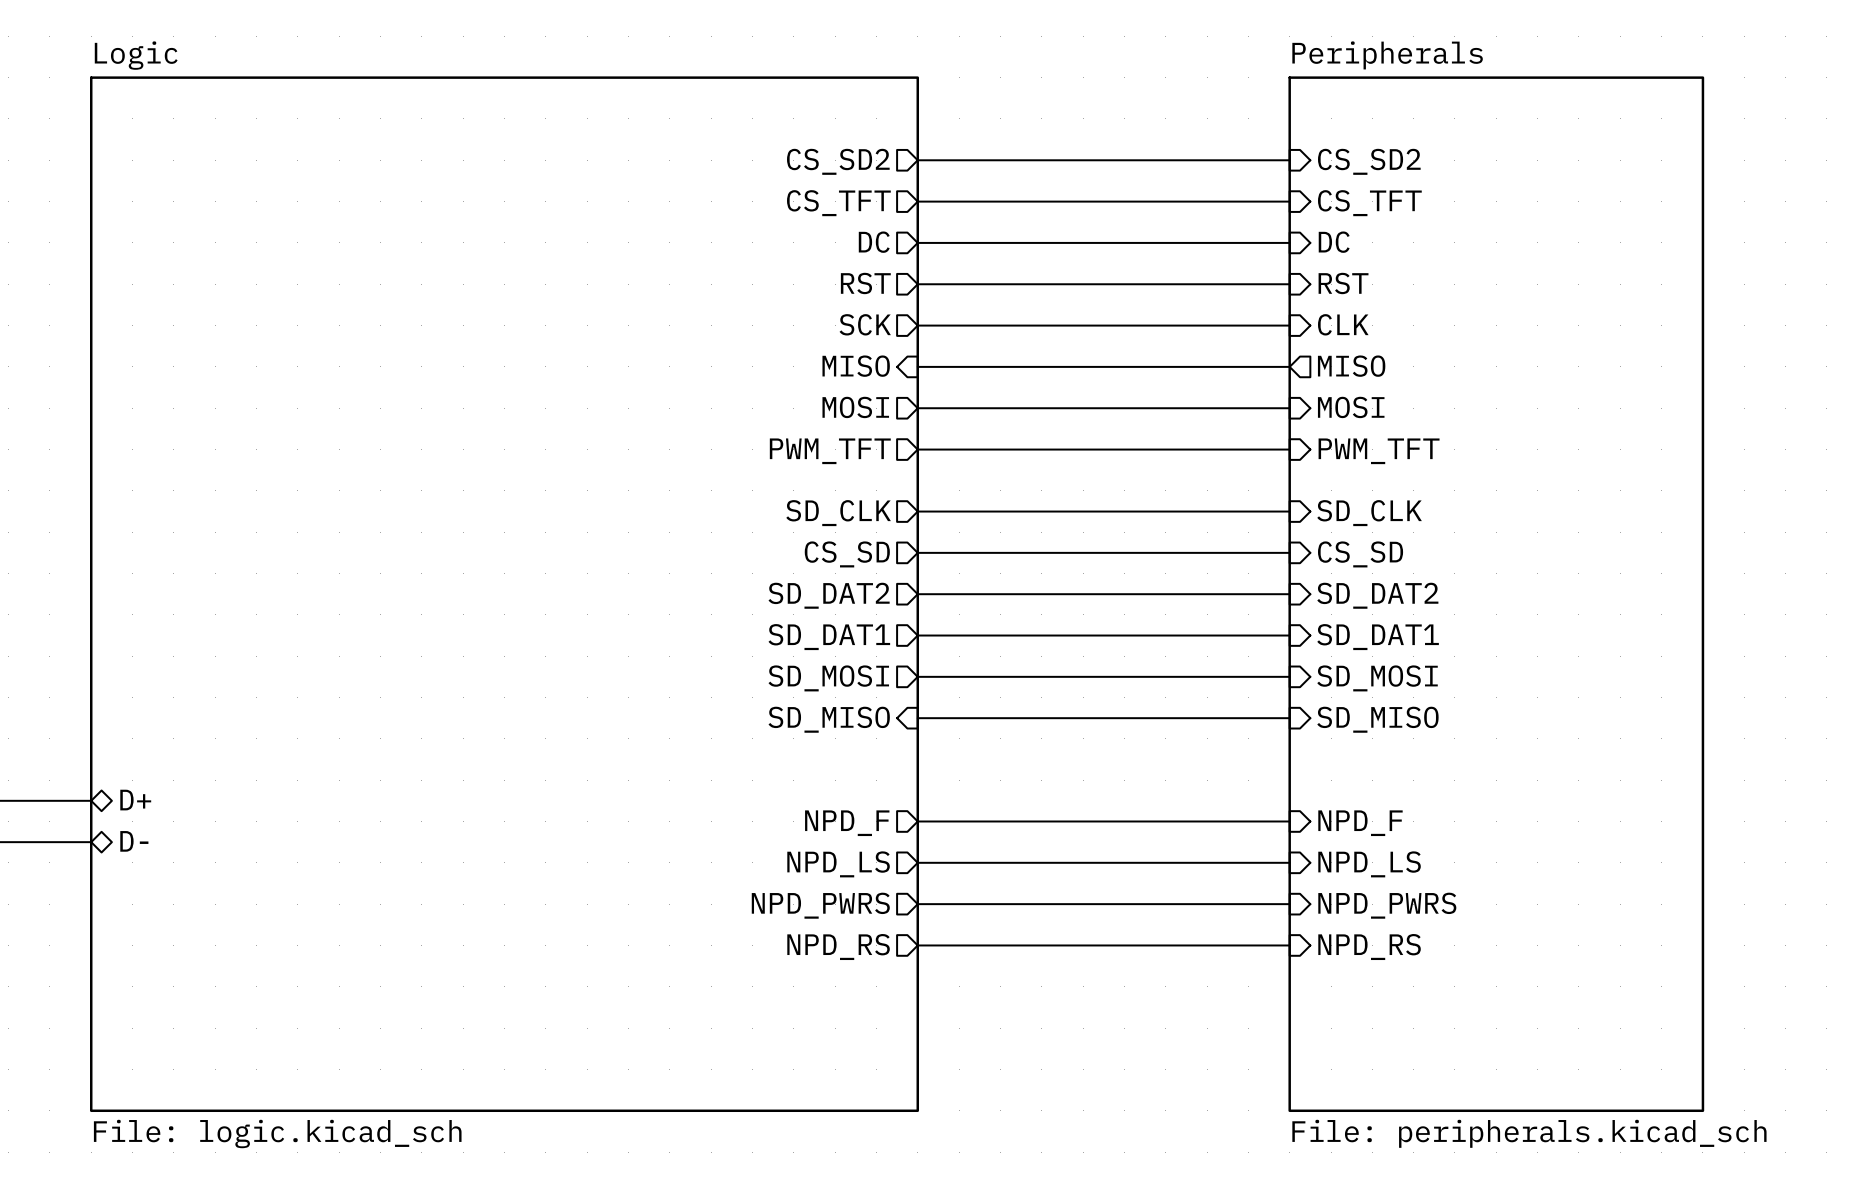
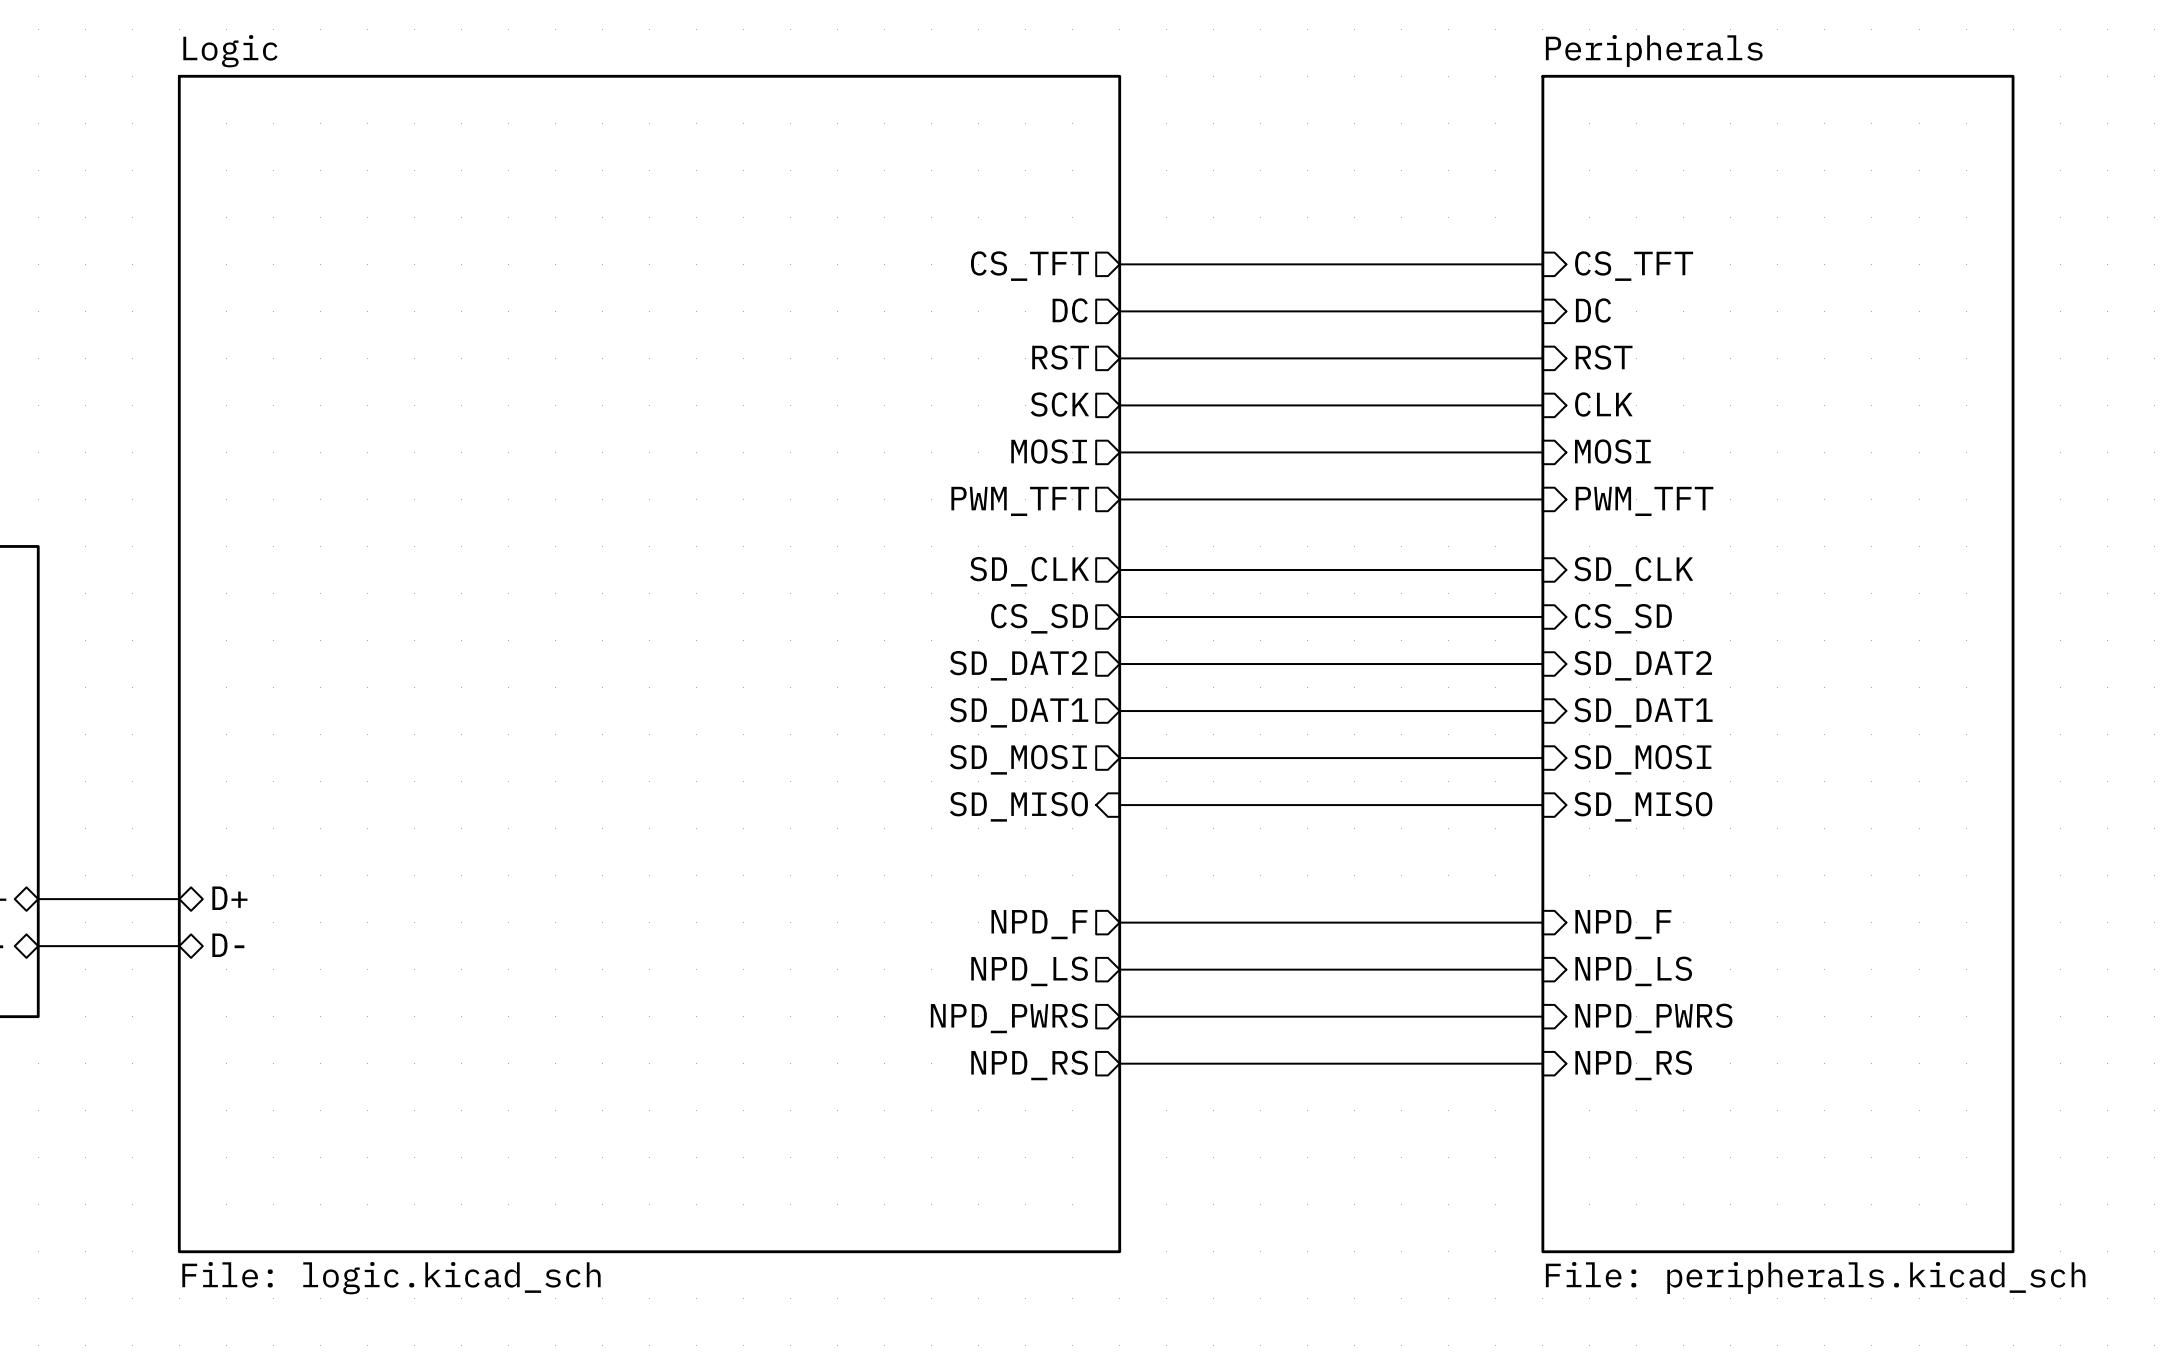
wire: (917, 160) (1289, 160) -> none
sheet pin: CS_SD2 (838, 161) -> none
sheet pin: CS_SD2 (1369, 161) -> none
wire: (917, 201) (1289, 201) -> none
sheet pin: CS_TFT (838, 203) -> none
sheet pin: CS_TFT (1369, 203) -> none
sheet pin: DC (874, 242) -> CS_TFT (1029, 266)
sheet pin: DC (1334, 242) -> CS_TFT (1634, 266)
sheet pin: RST (865, 283) -> DC (1070, 310)
sheet pin: RST (1343, 283) -> DC (1593, 310)
sheet pin: SCK (865, 324) -> RST (1060, 357)
sheet pin: CLK (1343, 324) -> RST (1604, 357)
sheet pin shape: input (856, 366) -> output (1059, 404)
sheet pin: MISO (856, 366) -> SCK (1059, 404)
sheet pin shape: output (1351, 366) -> input (1603, 404)
sheet pin: MISO (1351, 366) -> CLK (1603, 404)

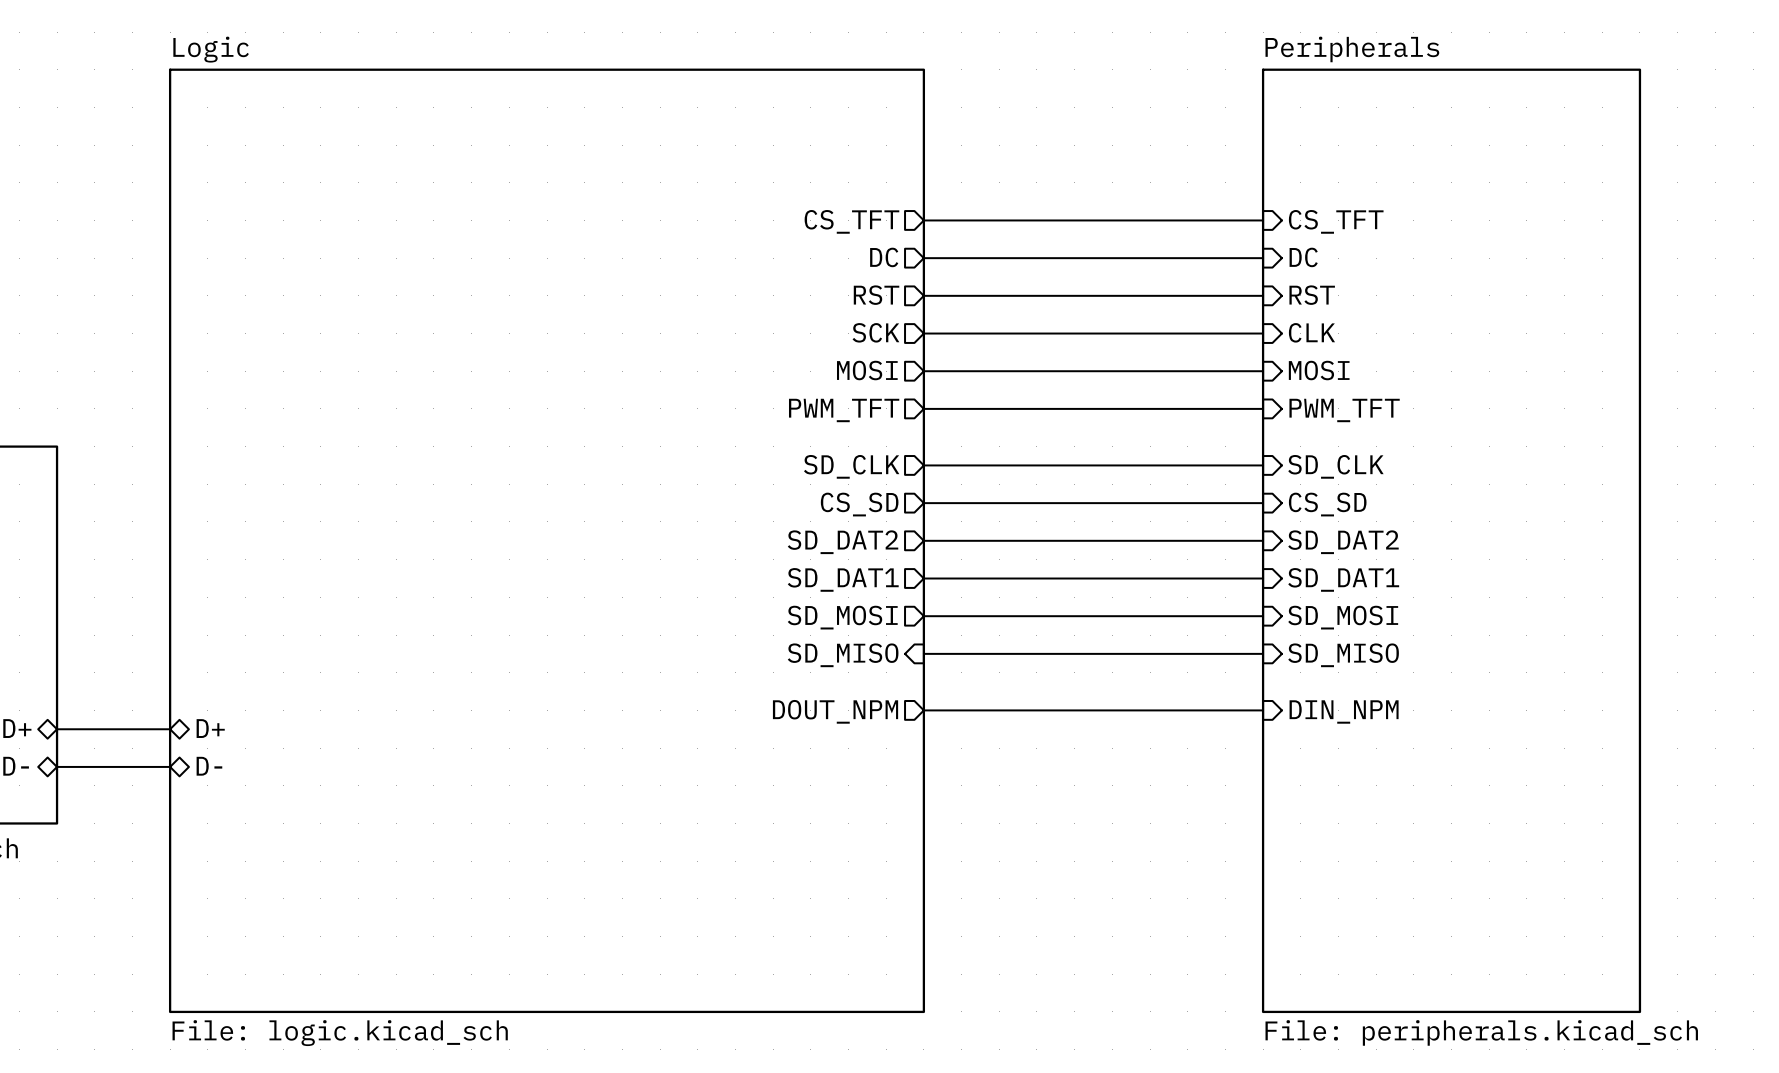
sheet pin: none -> DOUT_NPM (835, 711)
sheet pin: none -> DIN_NPM (1344, 711)
wire: (1119, 922) (1542, 922) -> (923, 710) (1263, 710)
sheet pin: NPD_F (1039, 924) -> none
sheet pin: NPD_F (1623, 924) -> none
wire: (1119, 969) (1542, 969) -> none
sheet pin: NPD_LS (1029, 971) -> none
sheet pin: NPD_LS (1633, 971) -> none
wire: (1119, 1016) (1542, 1016) -> none
sheet pin: NPD_PWRS (1009, 1018) -> none
sheet pin: NPD_PWRS (1653, 1018) -> none
wire: (1119, 1063) (1542, 1063) -> none
sheet pin: NPD_RS (1029, 1065) -> none
sheet pin: NPD_RS (1633, 1065) -> none

